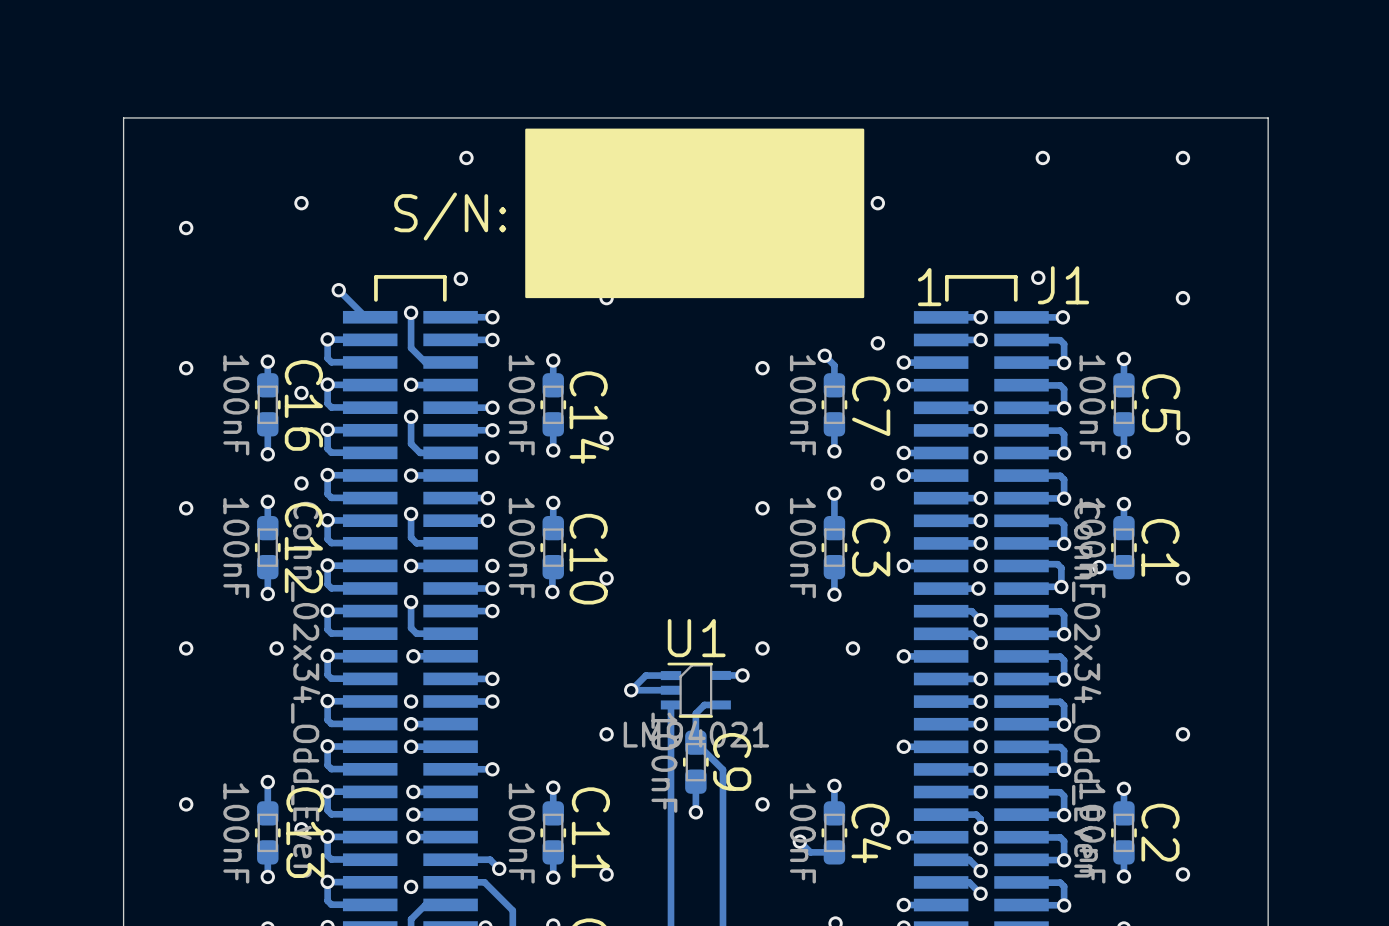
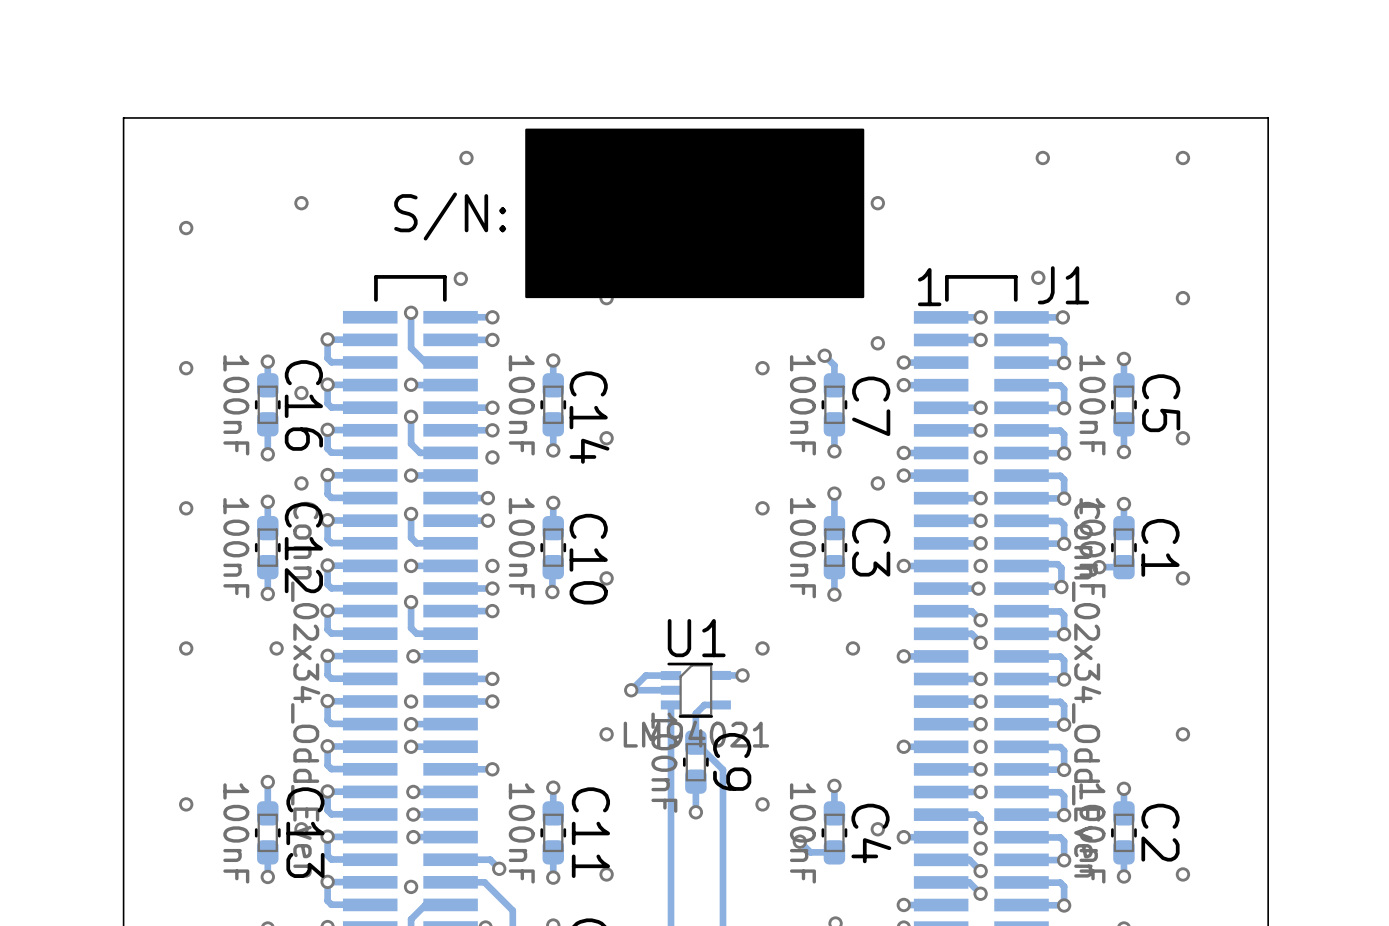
track: (338, 290) (365, 317) (370, 317) -> none
via: (338, 290) -> none

